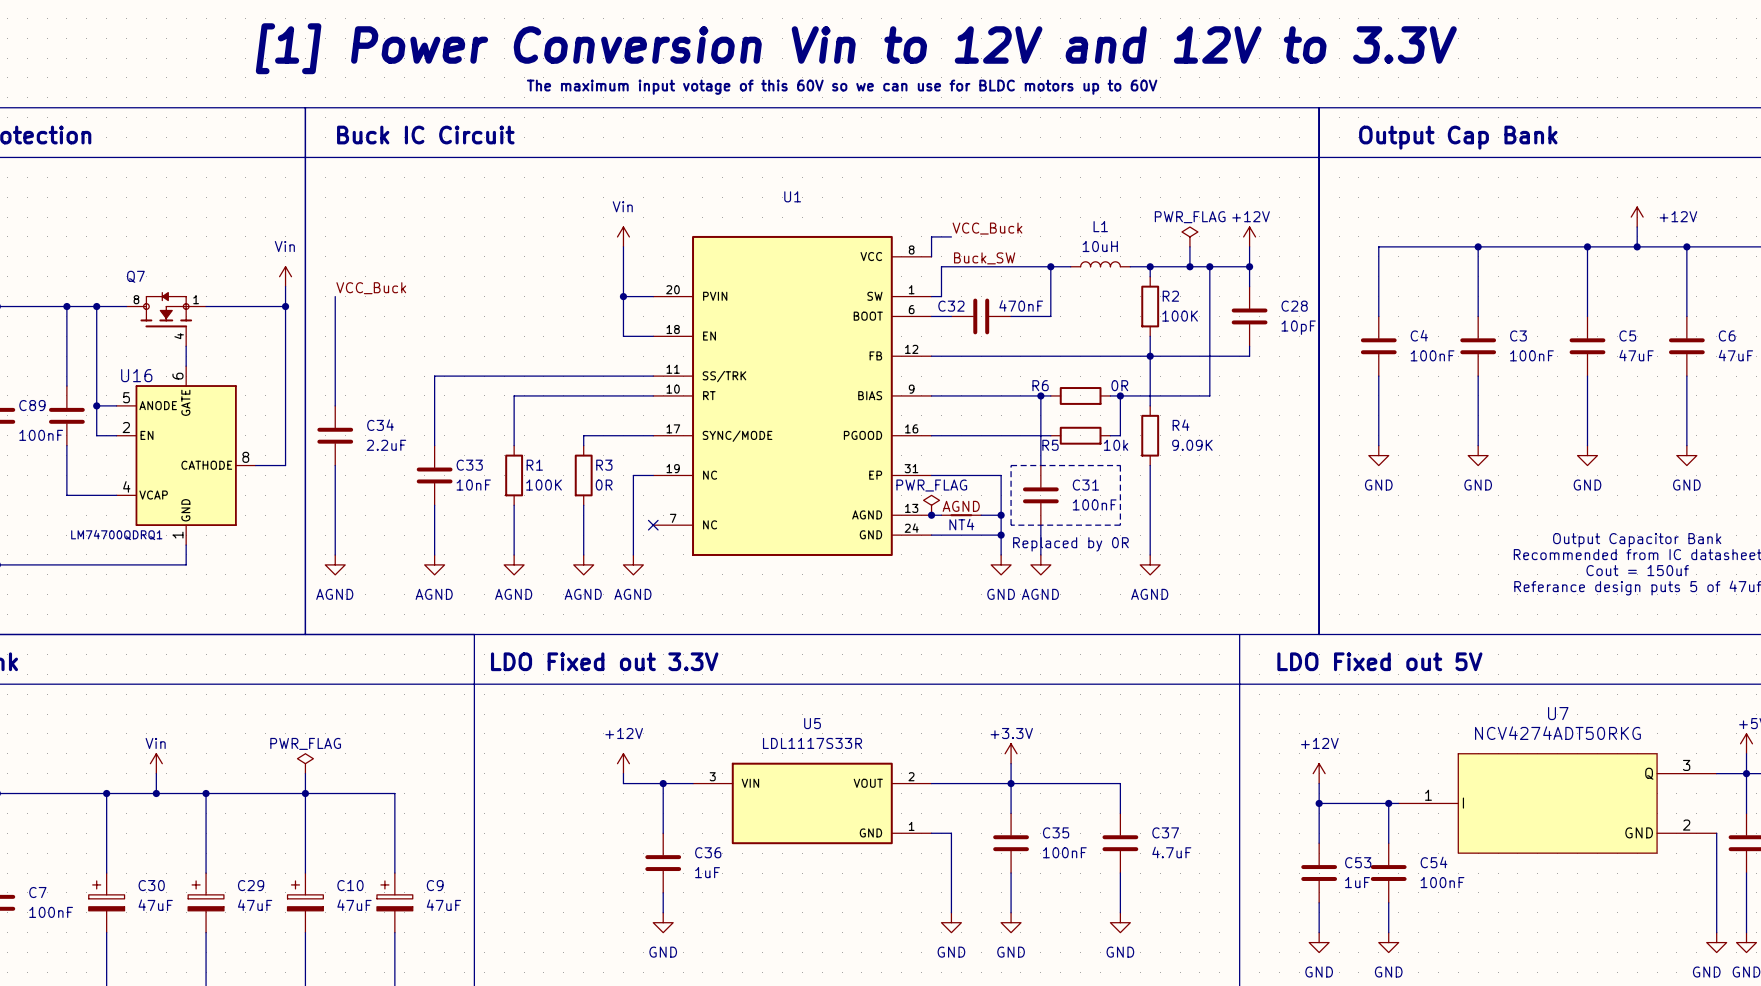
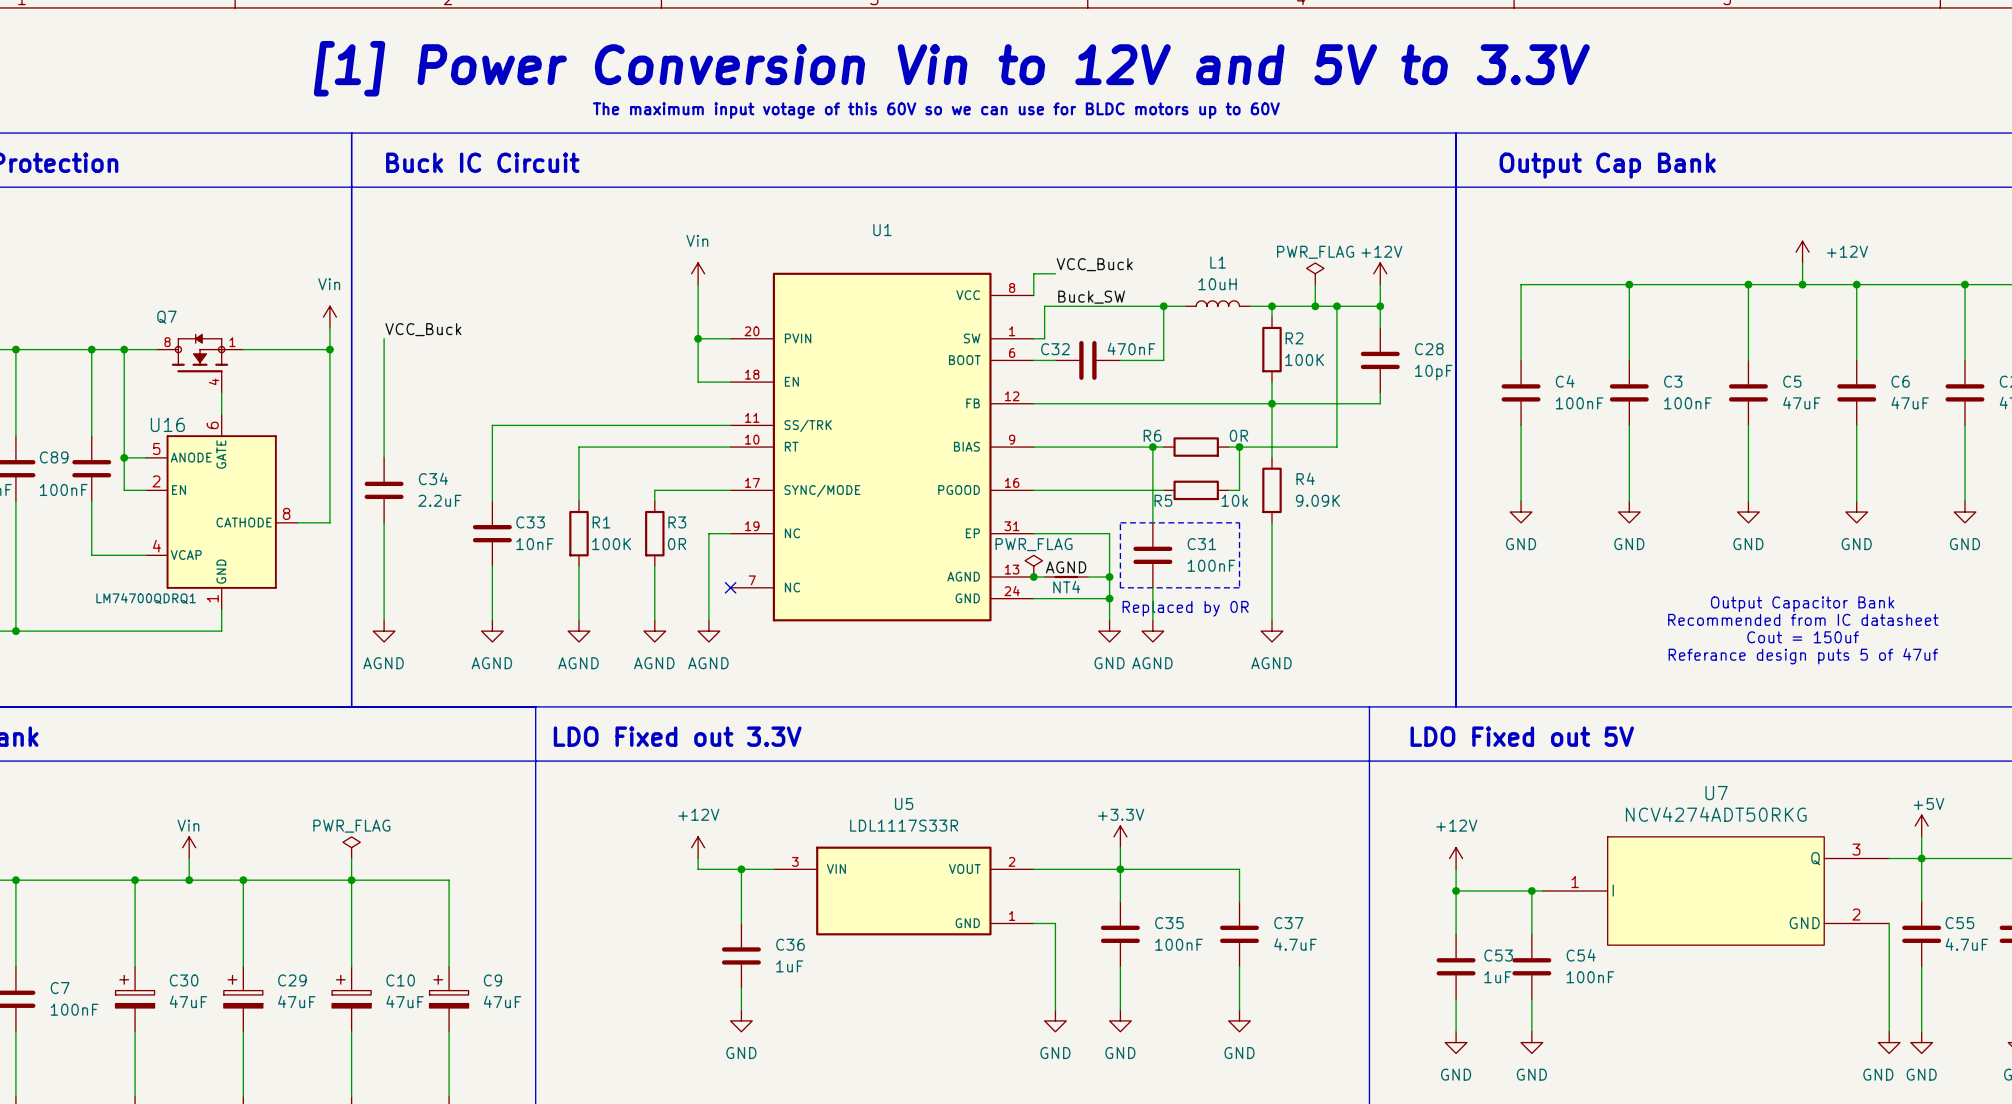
text: [1] Power Conversion Vin to 12V and 12V to 3.3V (856, 48) -> [1] Power Conversion Vin to 12V and 5V to 3.3V (951, 68)

